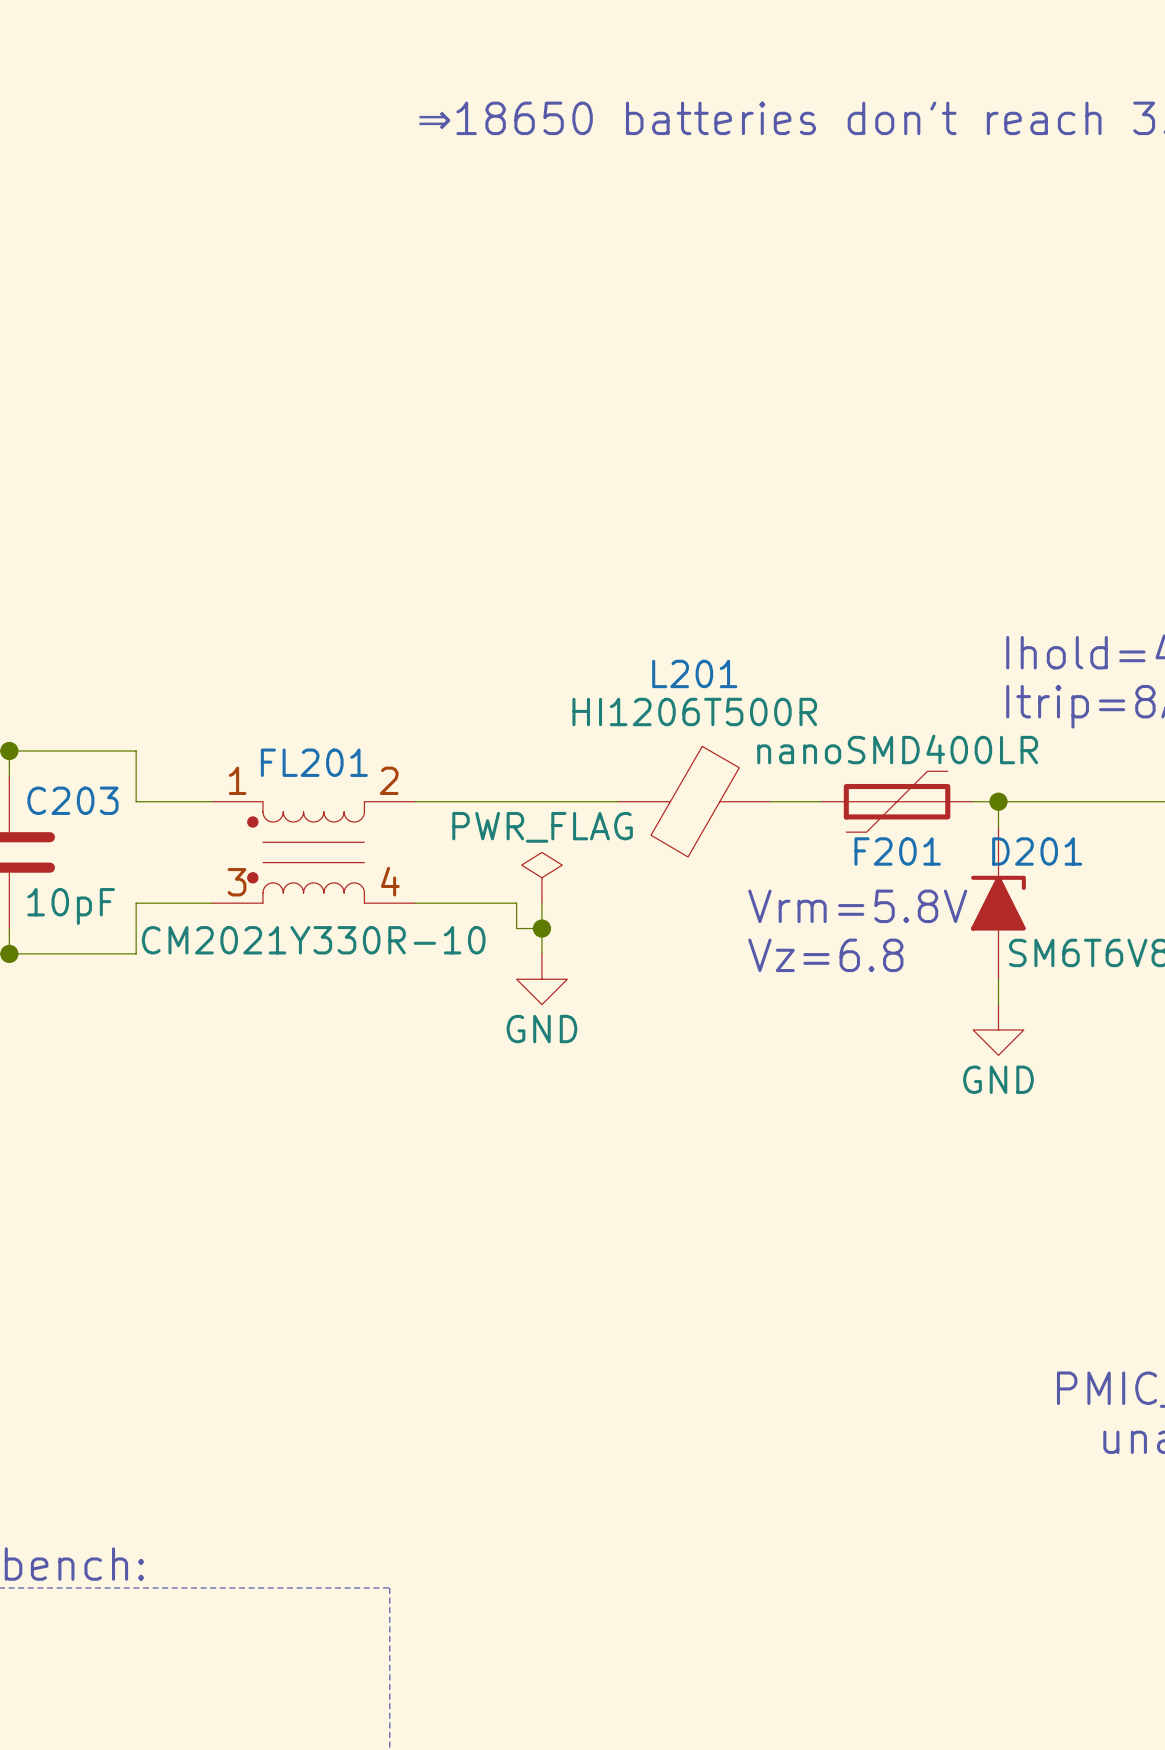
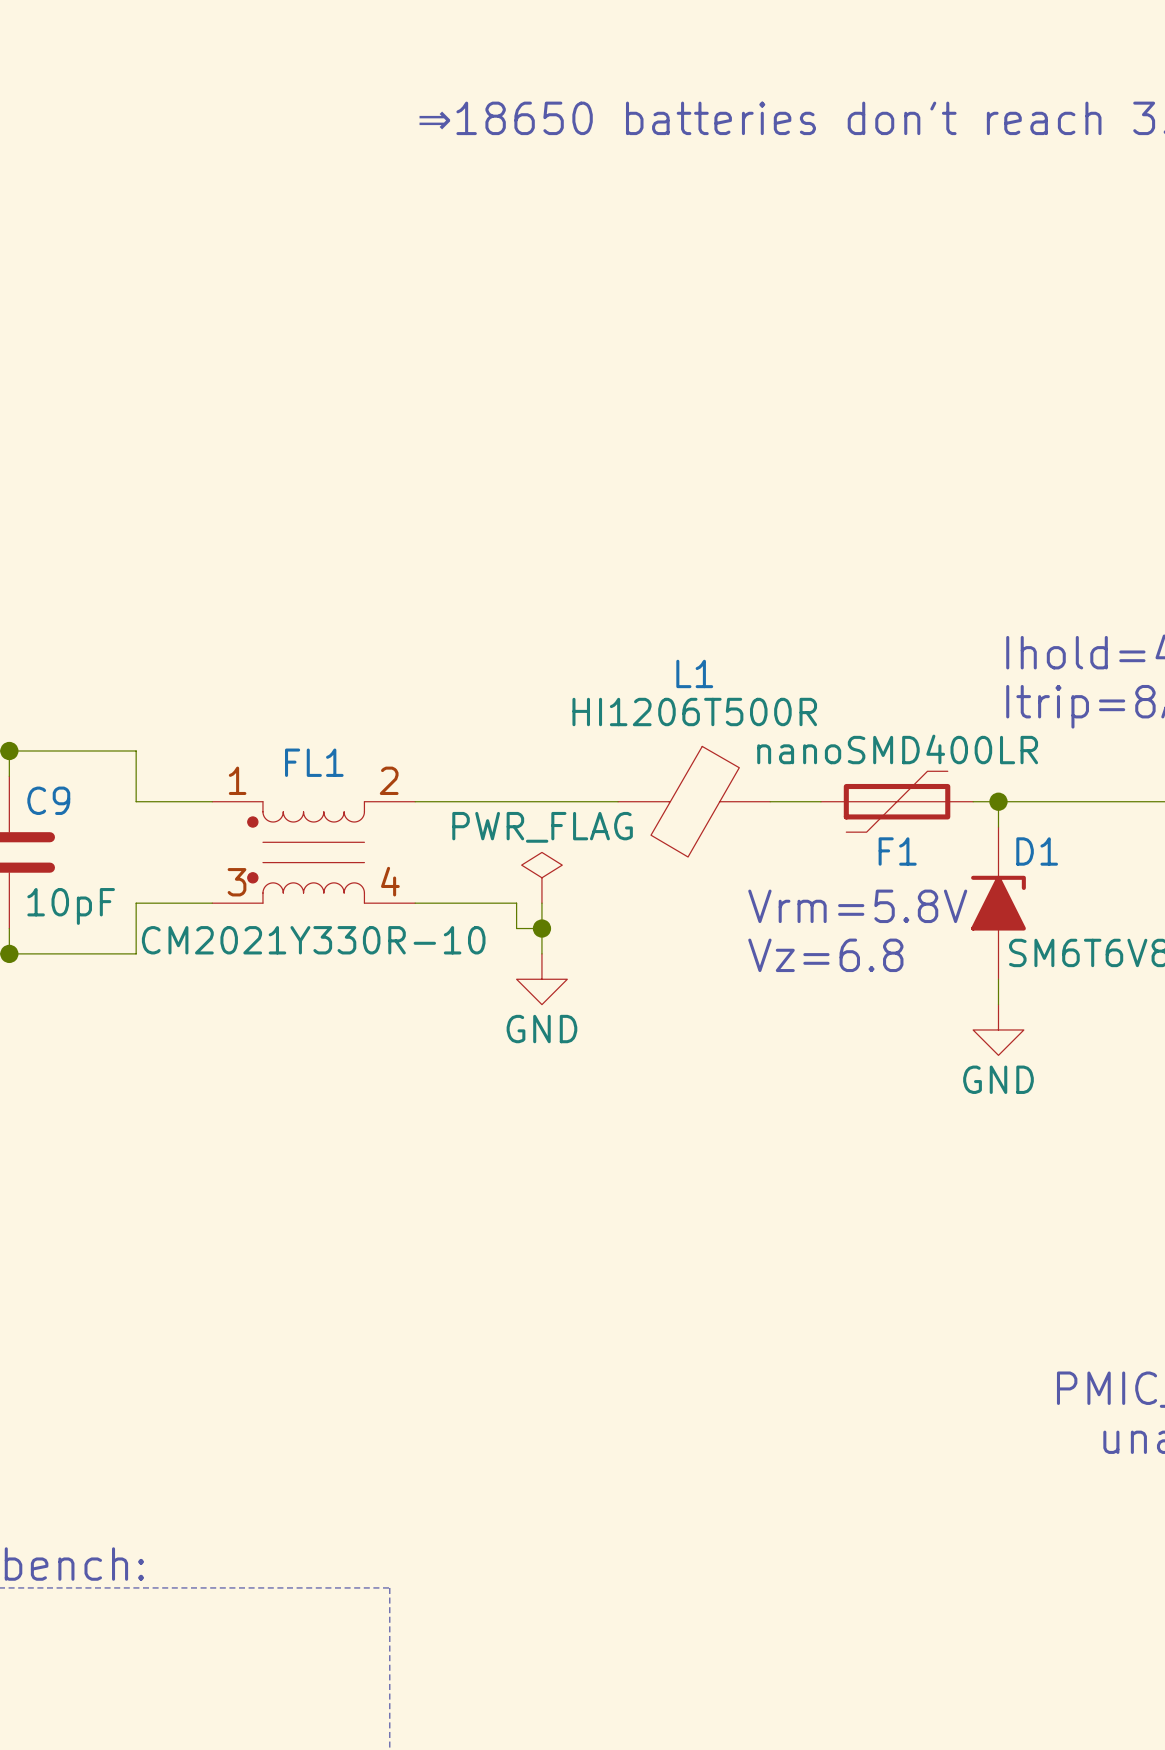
L201 name: L201 (694, 673) -> L1 (694, 673)
FL201 name: FL201 (314, 762) -> FL1 (314, 762)
C203 name: C203 (72, 800) -> C9 (48, 800)
F201 name: F201 (897, 851) -> F1 (897, 851)
D201 name: D201 (1037, 851) -> D1 (1037, 851)

